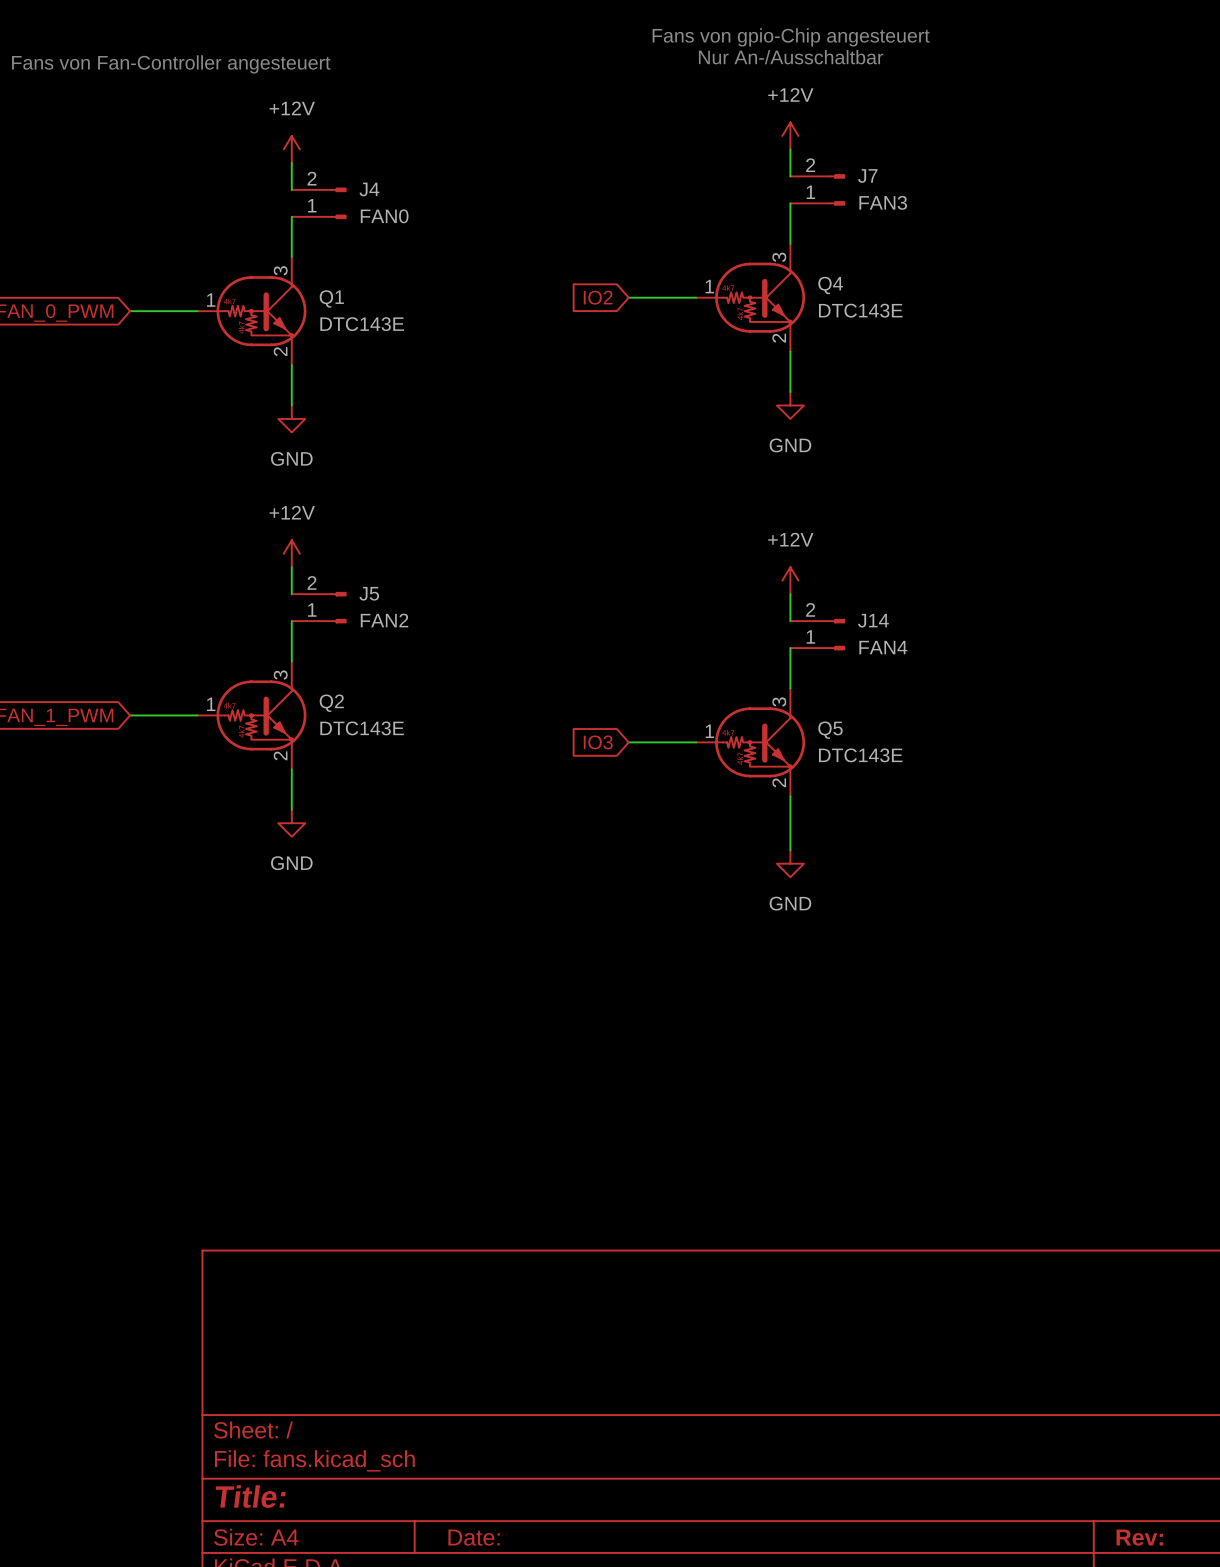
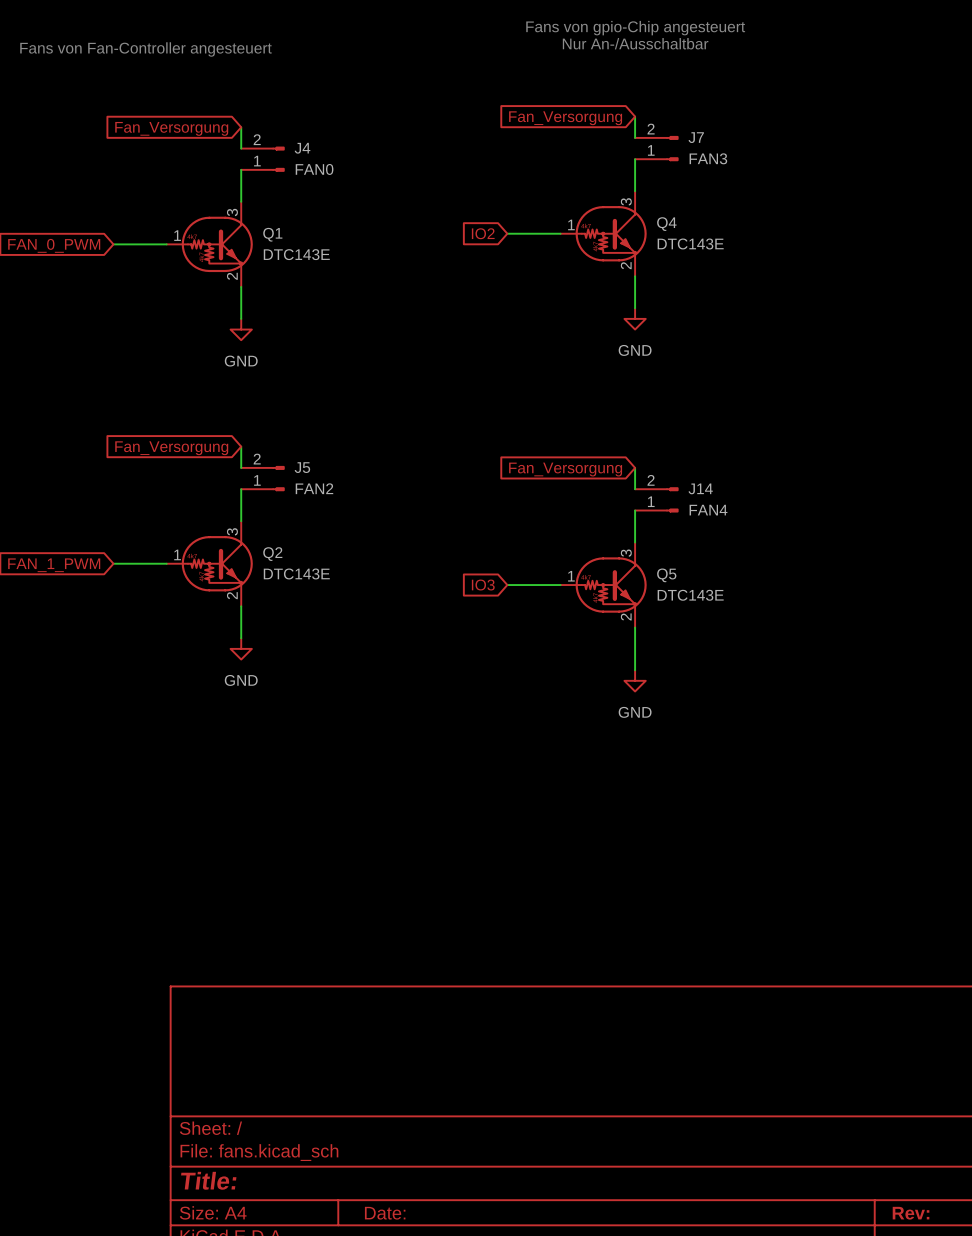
power symbol: +12V (790, 135) -> none
power symbol: +12V (291, 149) -> none
global label: none -> Fan_Versorgung (565, 118)
global label: none -> Fan_Versorgung (171, 128)
power symbol: +12V (291, 553) -> none
global label: none -> Fan_Versorgung (171, 448)
power symbol: +12V (790, 580) -> none
global label: none -> Fan_Versorgung (565, 469)

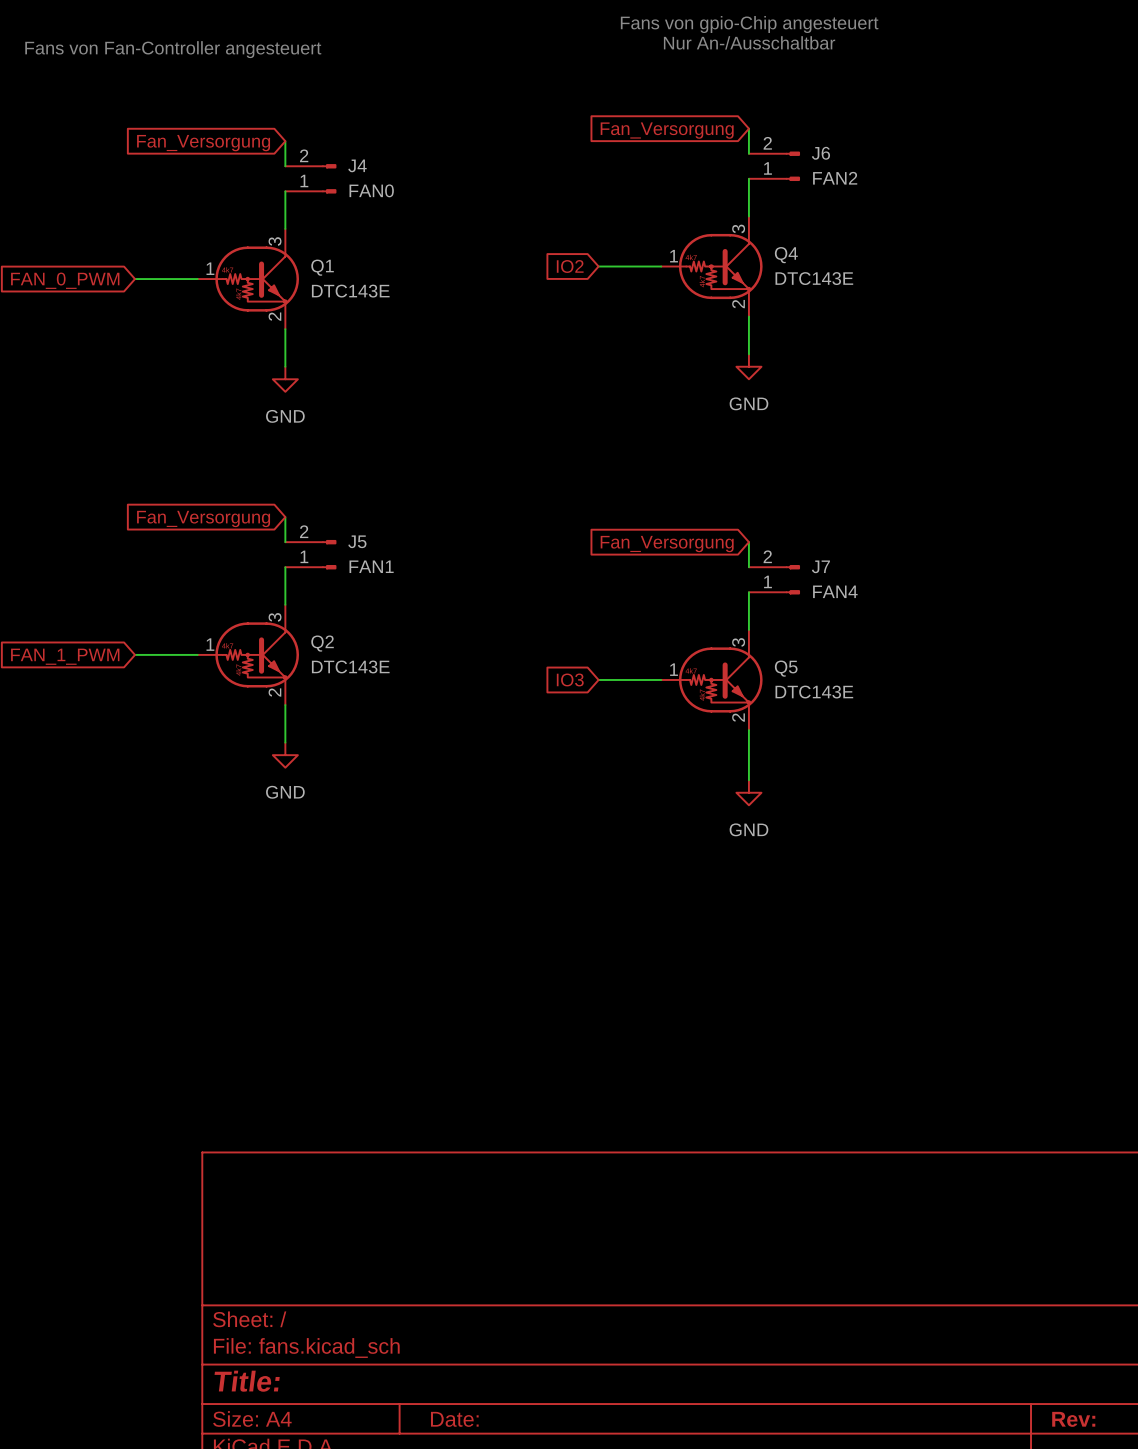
J7 name: J7 (696, 137) -> J6 (820, 153)
J7 value: FAN3 (708, 158) -> FAN2 (835, 178)
J5 value: FAN2 (314, 488) -> FAN1 (371, 566)
J14 name: J14 (700, 488) -> J7 (820, 566)

